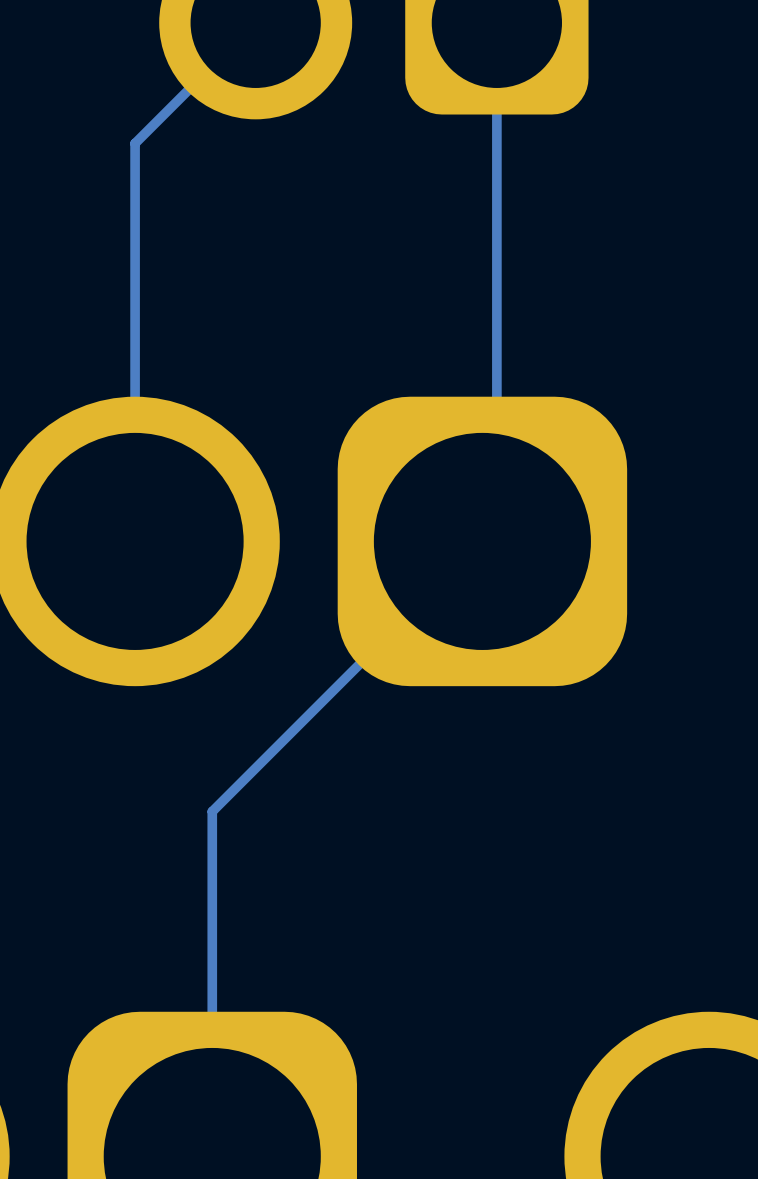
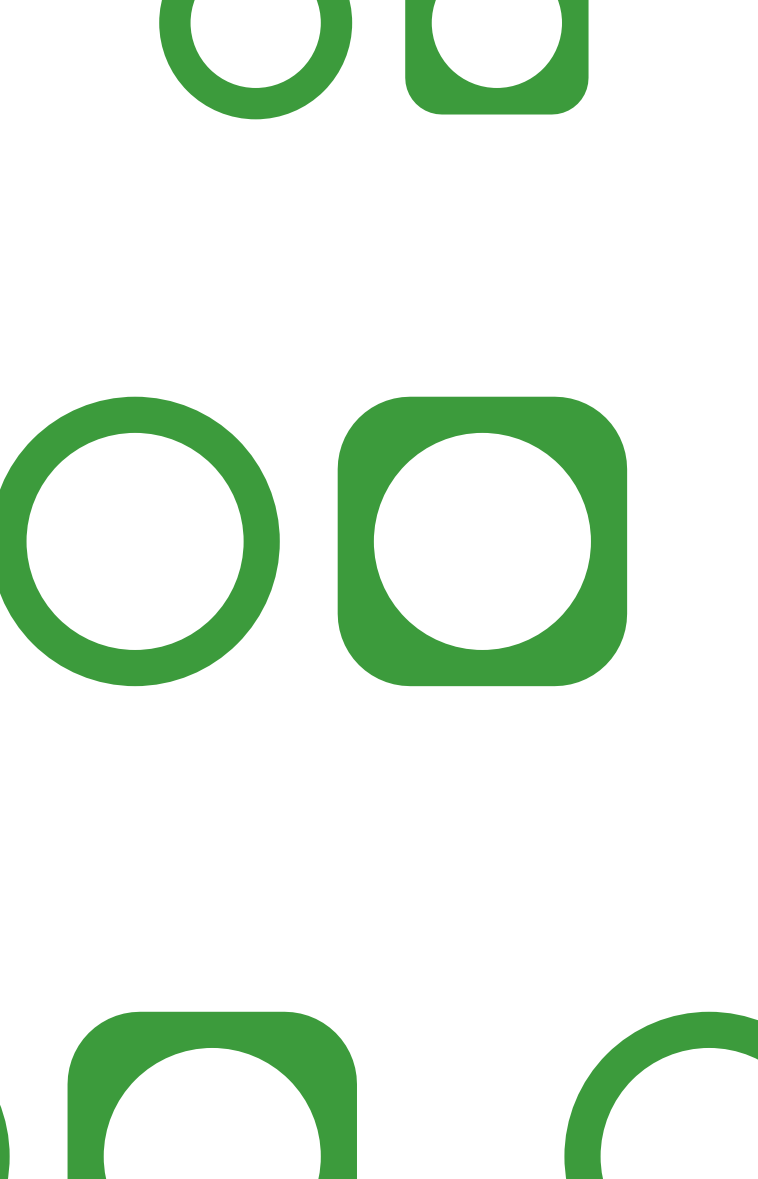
track: (255, 22) (135, 143) (135, 541) -> none
track: (496, 22) (496, 526) (212, 811) (212, 1156) -> none

